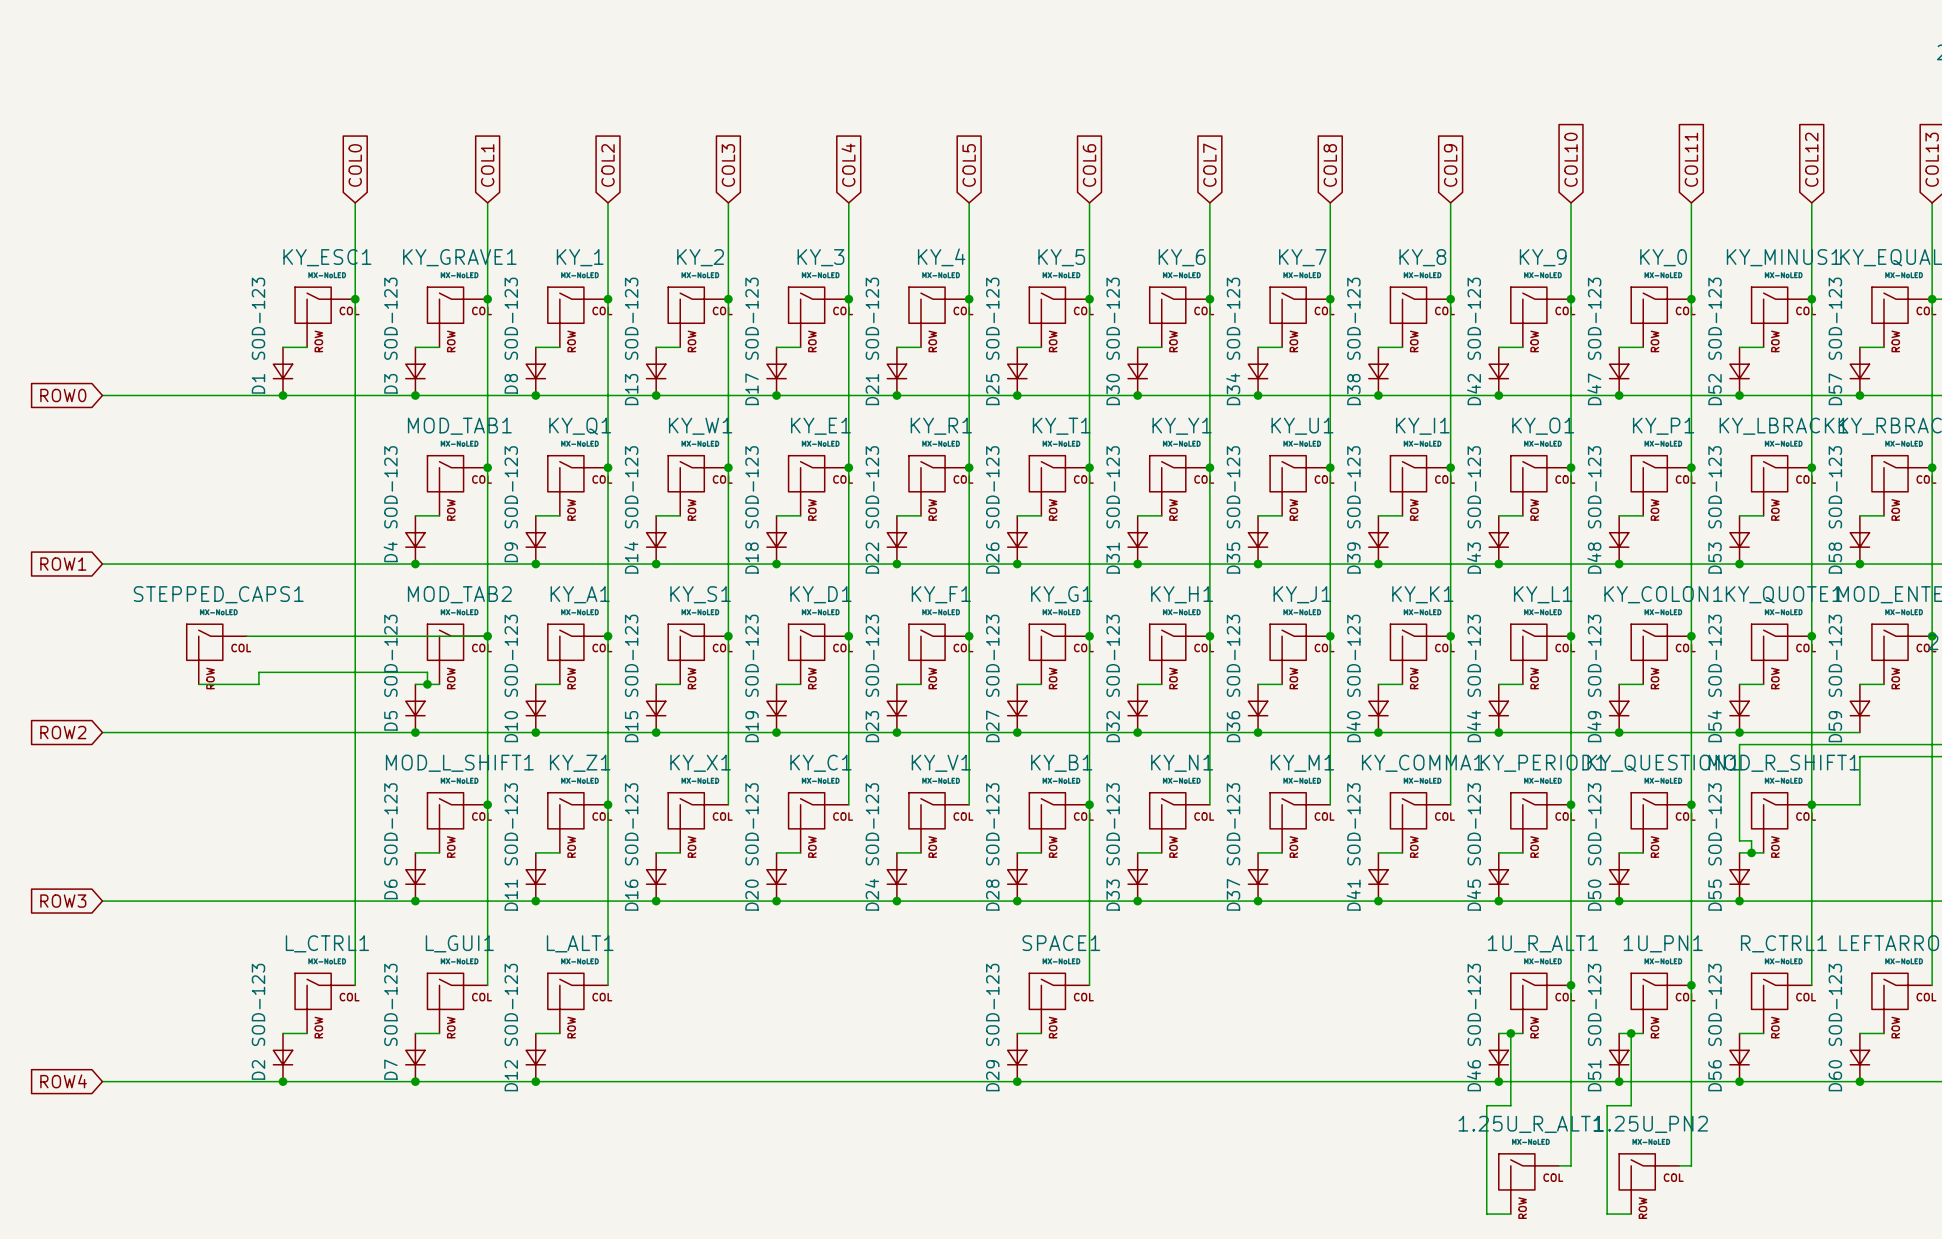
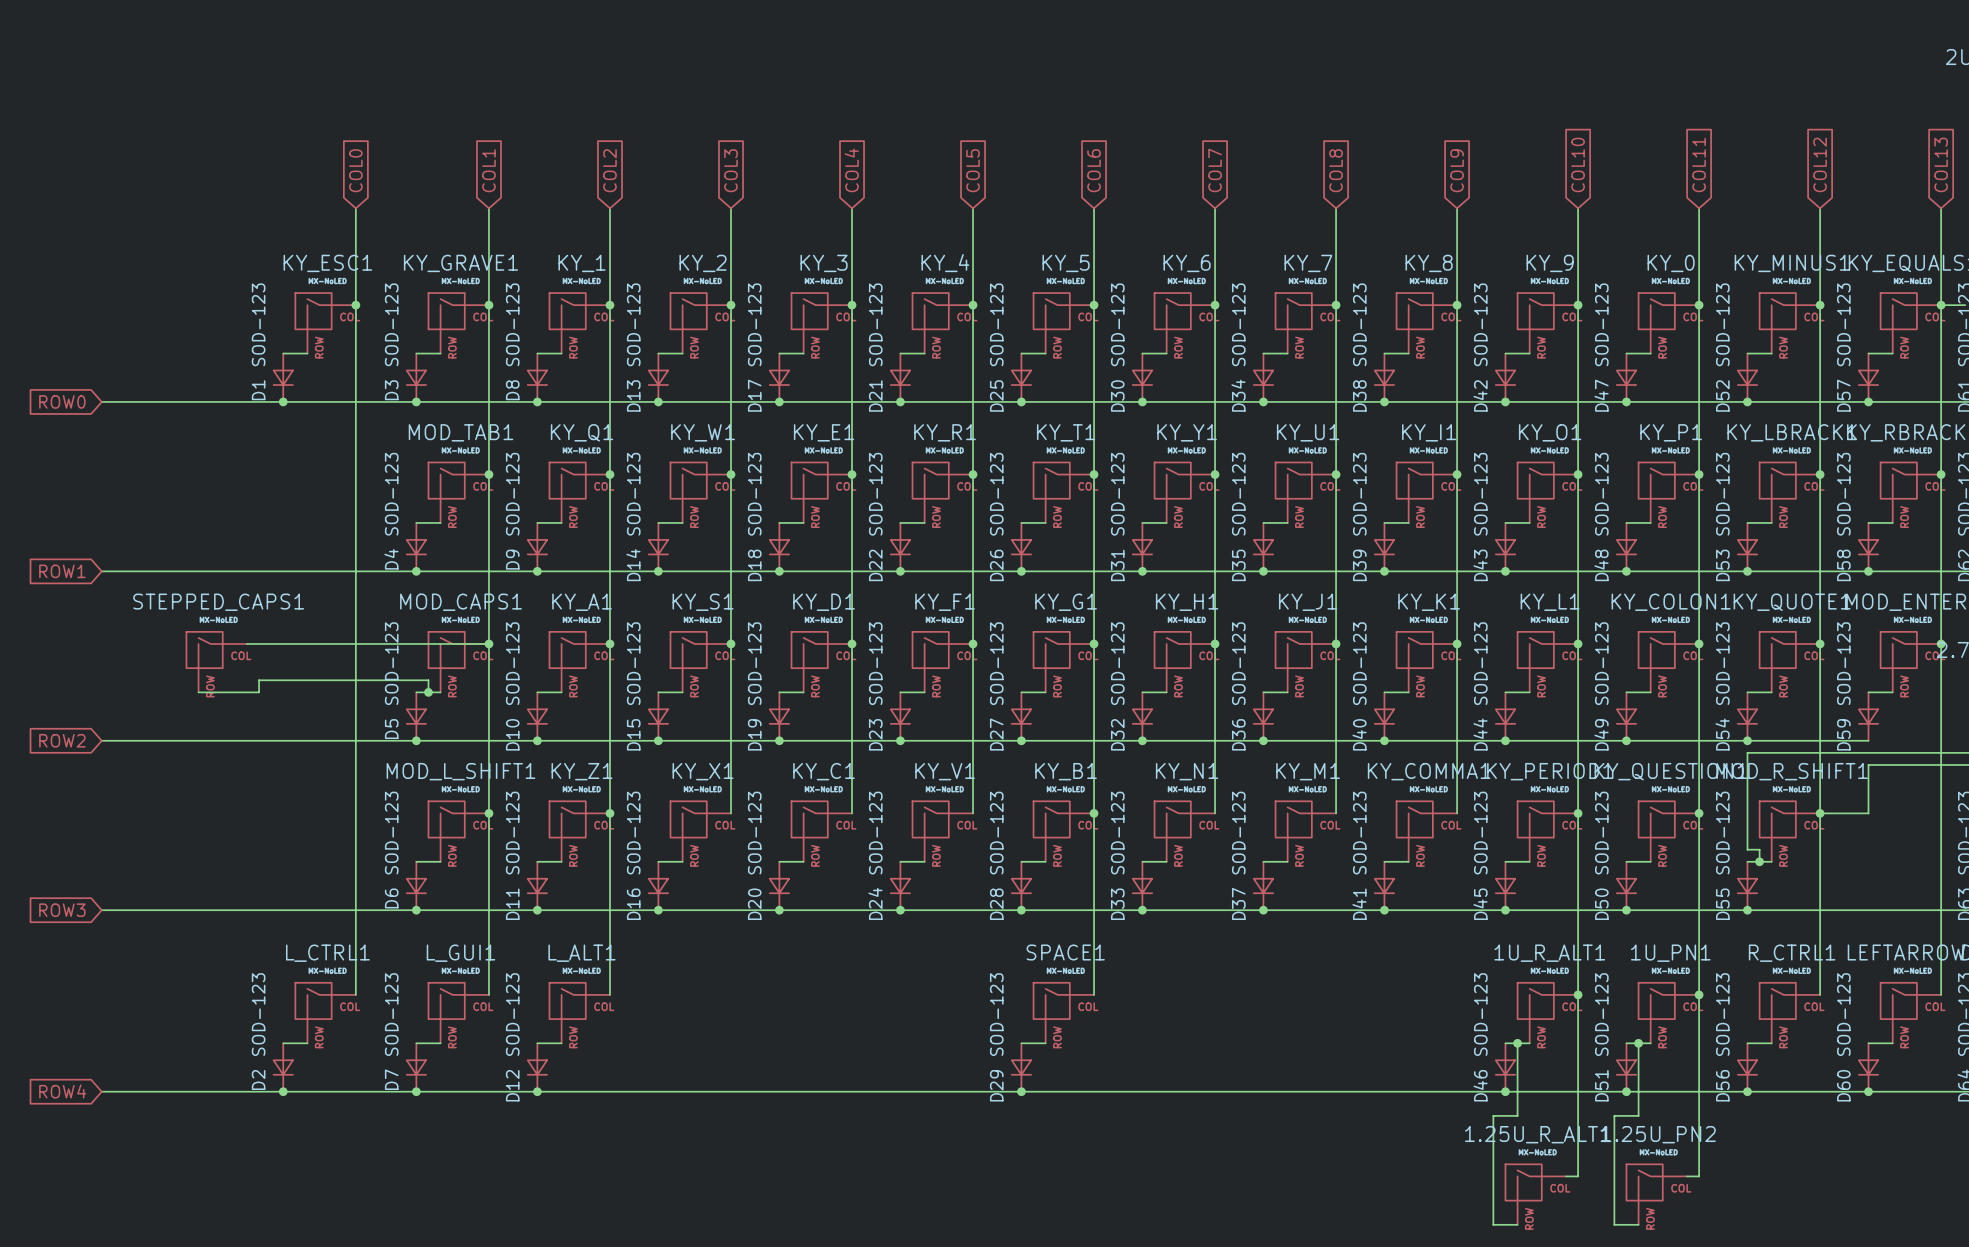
MOD_TAB2 name: MOD_TAB2 (459, 594) -> MOD_CAPS1 (461, 602)

